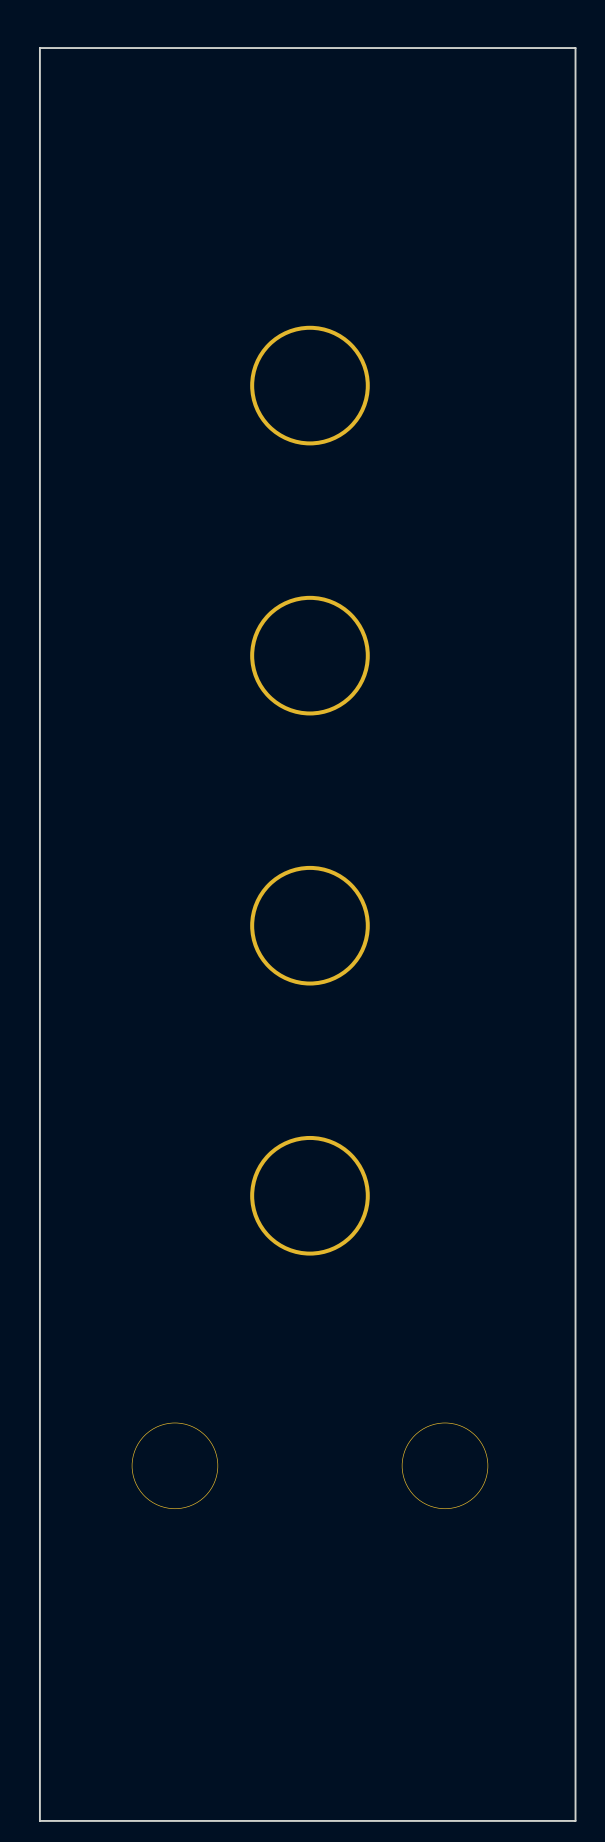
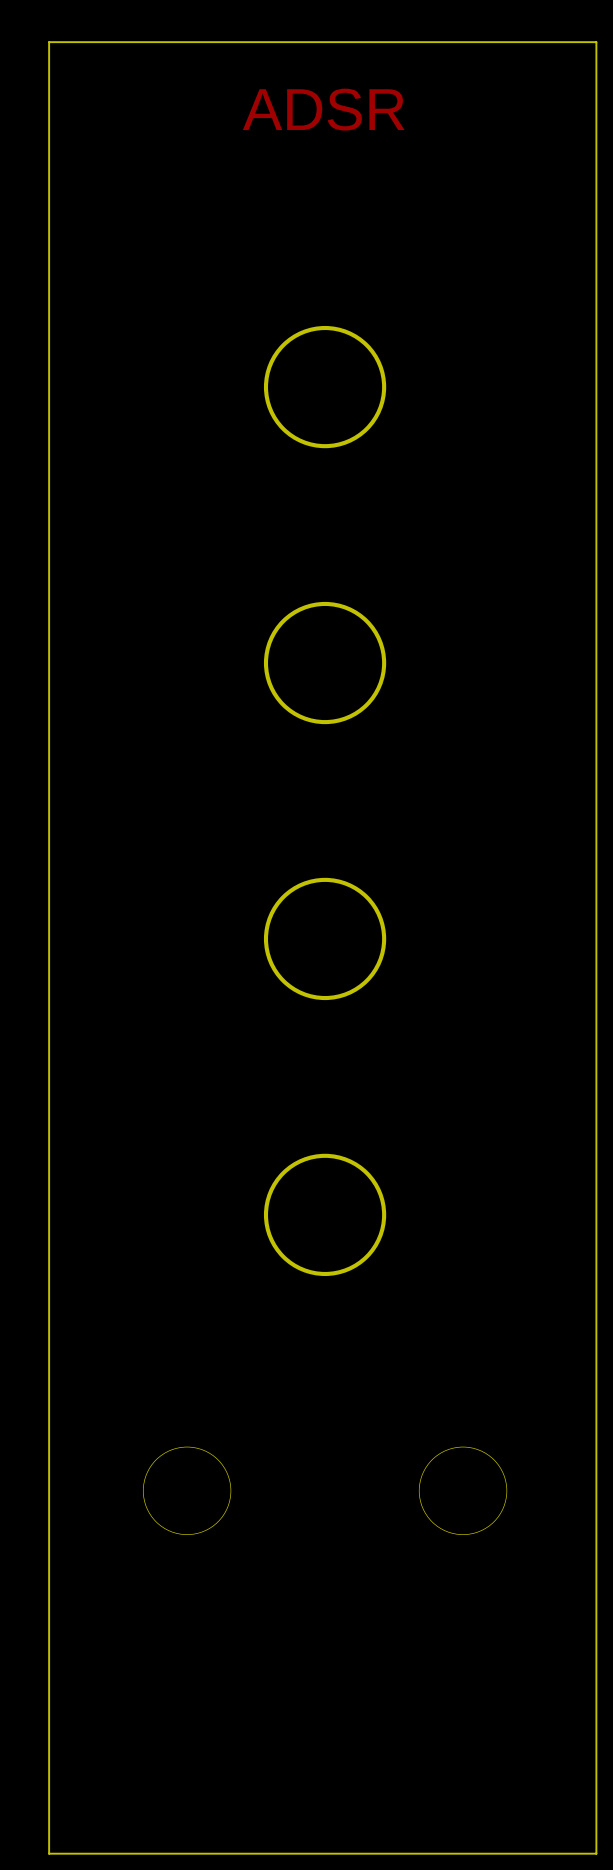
text: none -> ADSR (323, 109)

